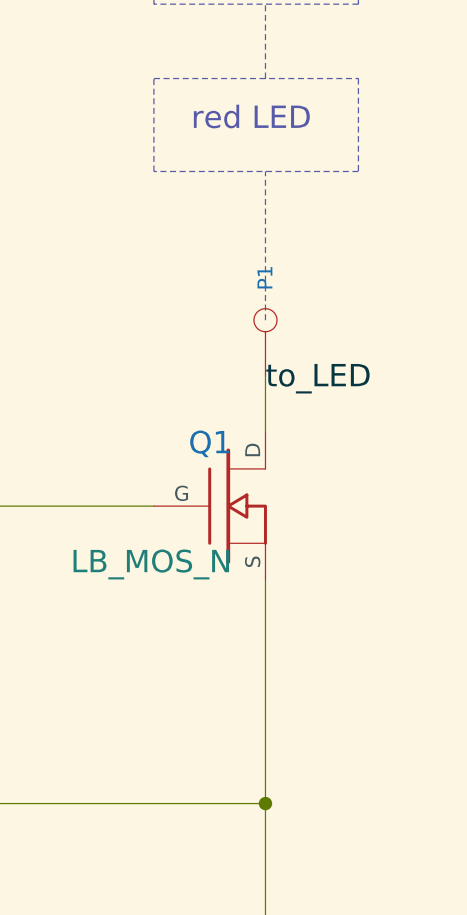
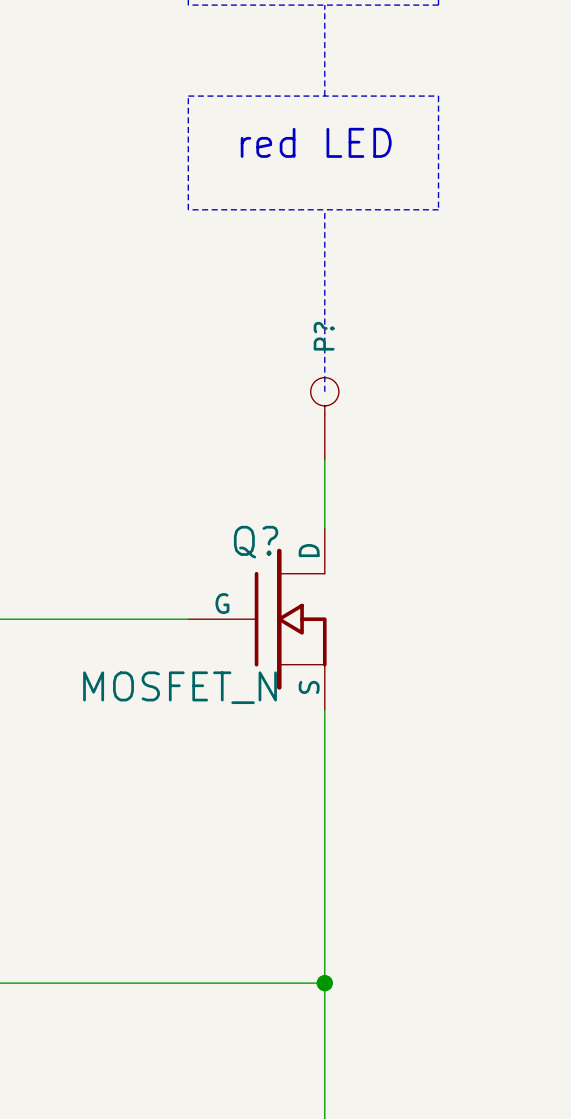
P1 name: P1 (264, 277) -> P? (324, 336)
label: to_LED (317, 378) -> none
Q1 name: Q1 (209, 443) -> Q? (256, 542)
Q1 value: LB_MOS_N (151, 564) -> MOSFET_N (180, 687)

